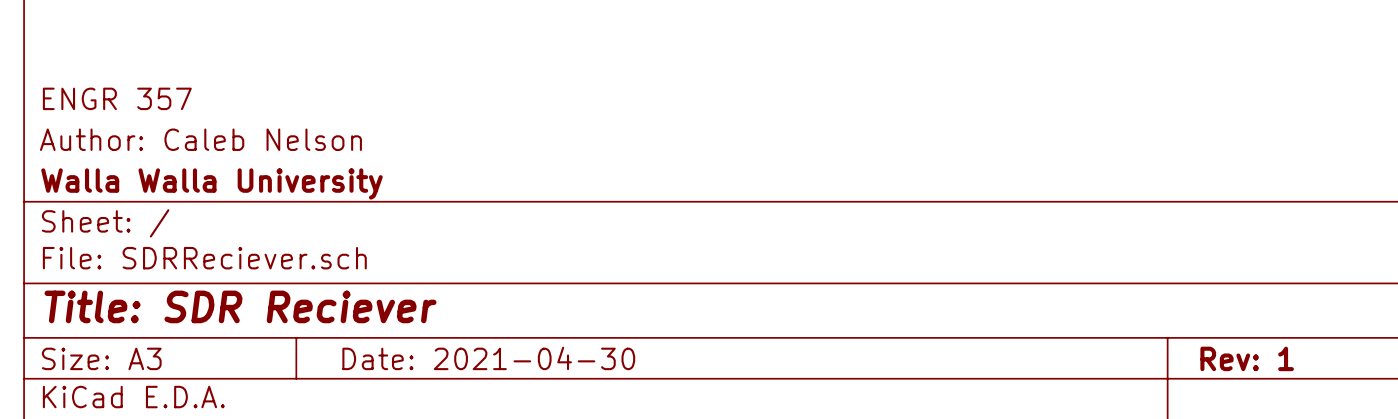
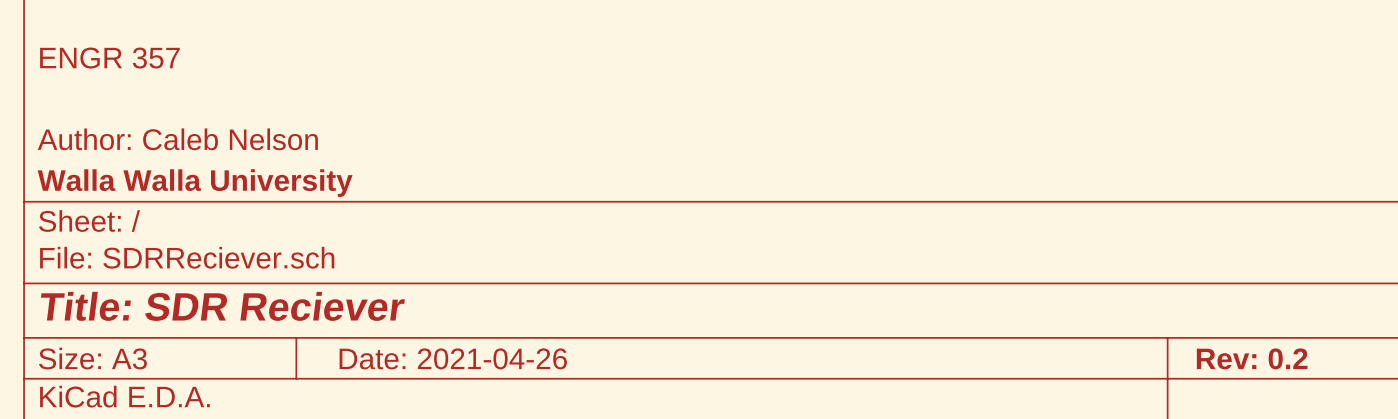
title block position: ENGR 357 (117, 98) -> ENGR 357 (109, 58)
title block: Date: 2021-04-30 (488, 358) -> Date: 2021-04-26 (453, 358)
title block: Rev: 1 (1247, 358) -> Rev: 0.2 (1252, 358)

